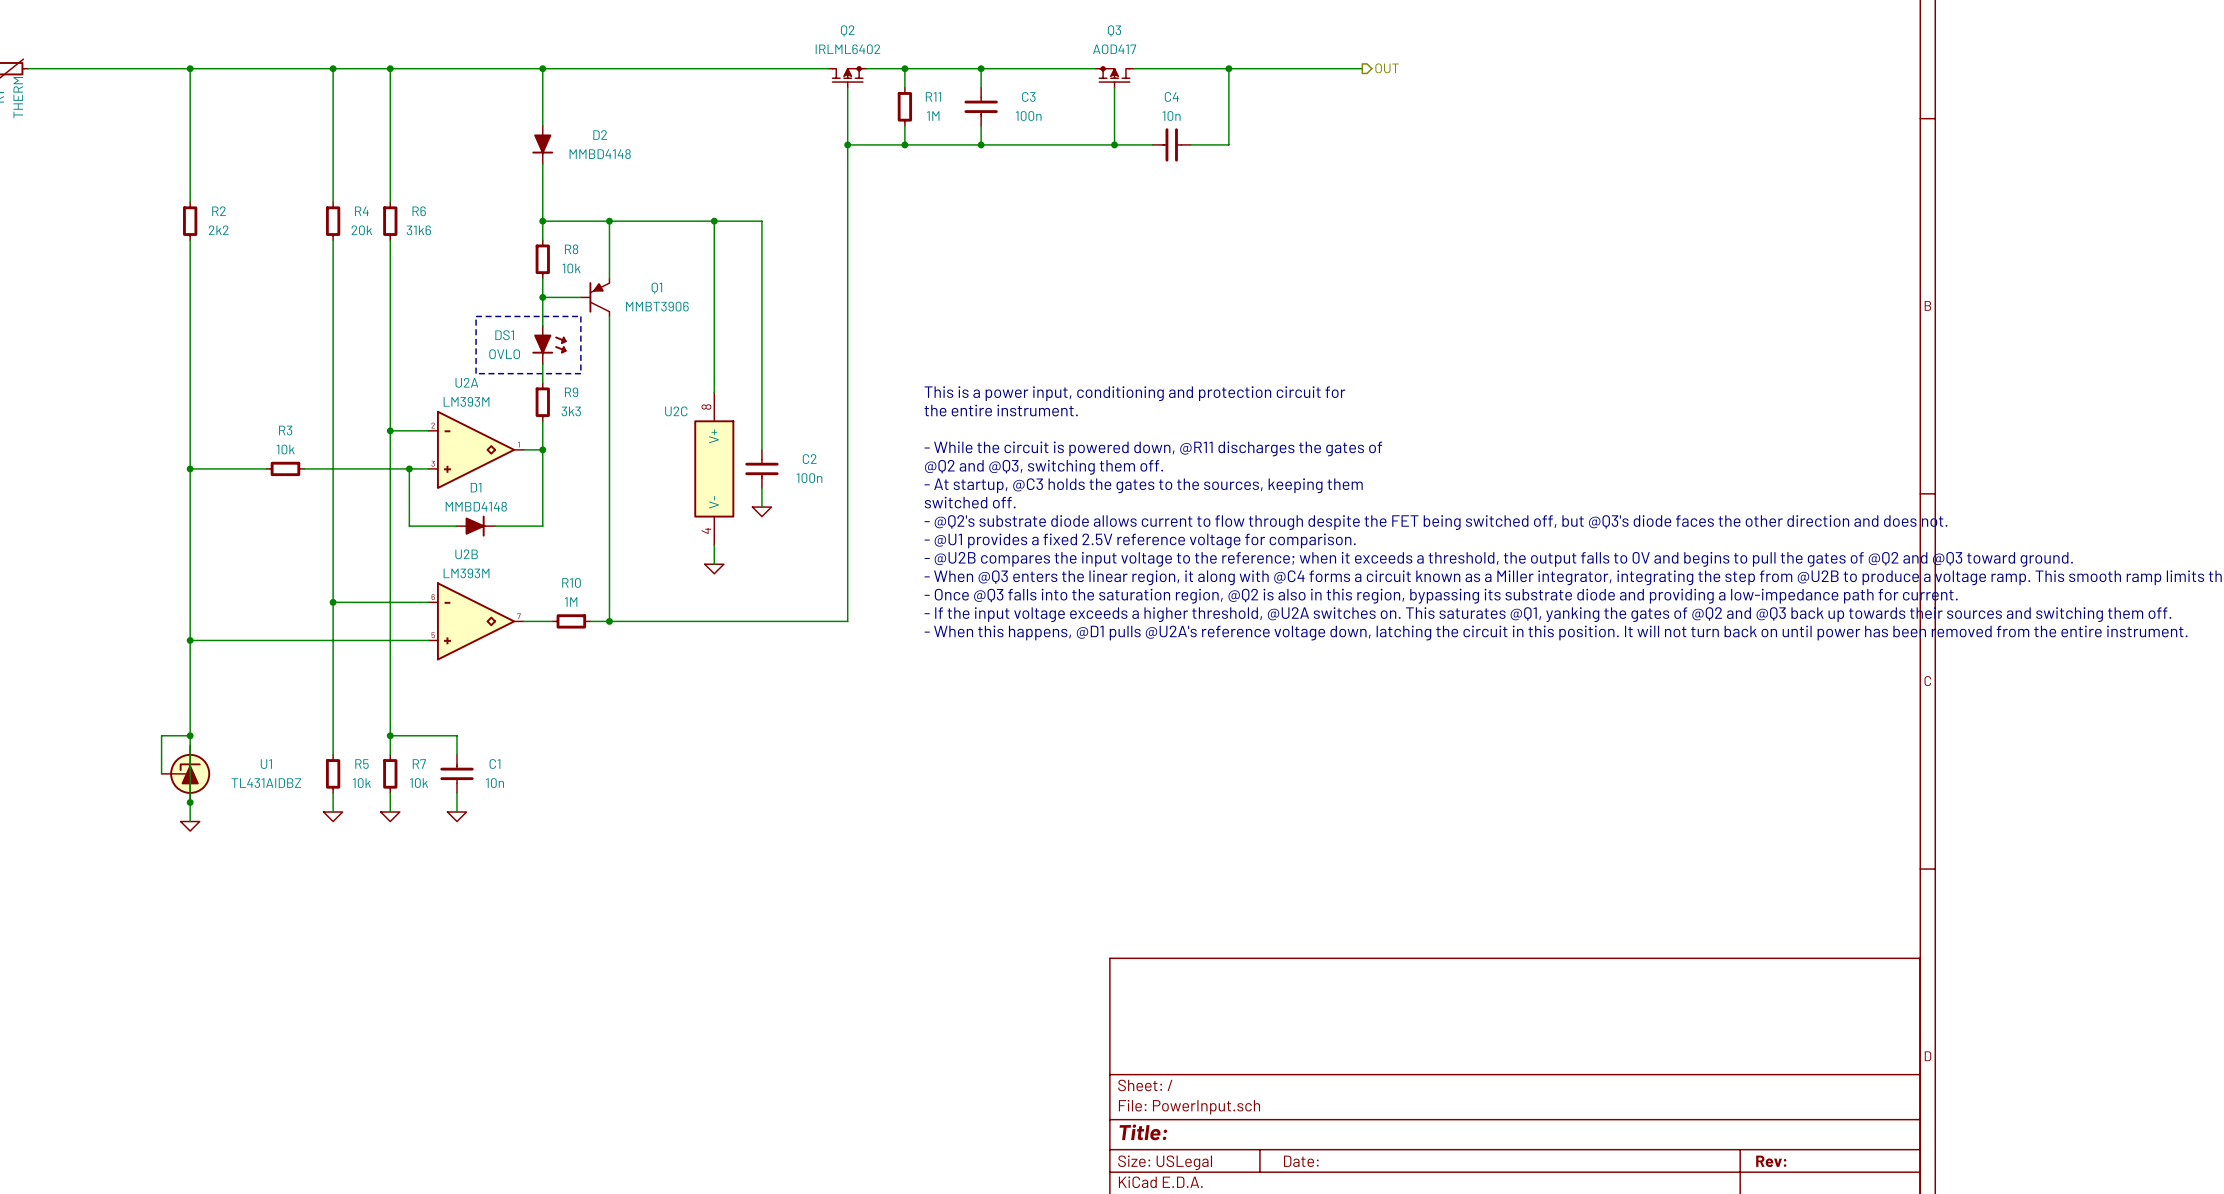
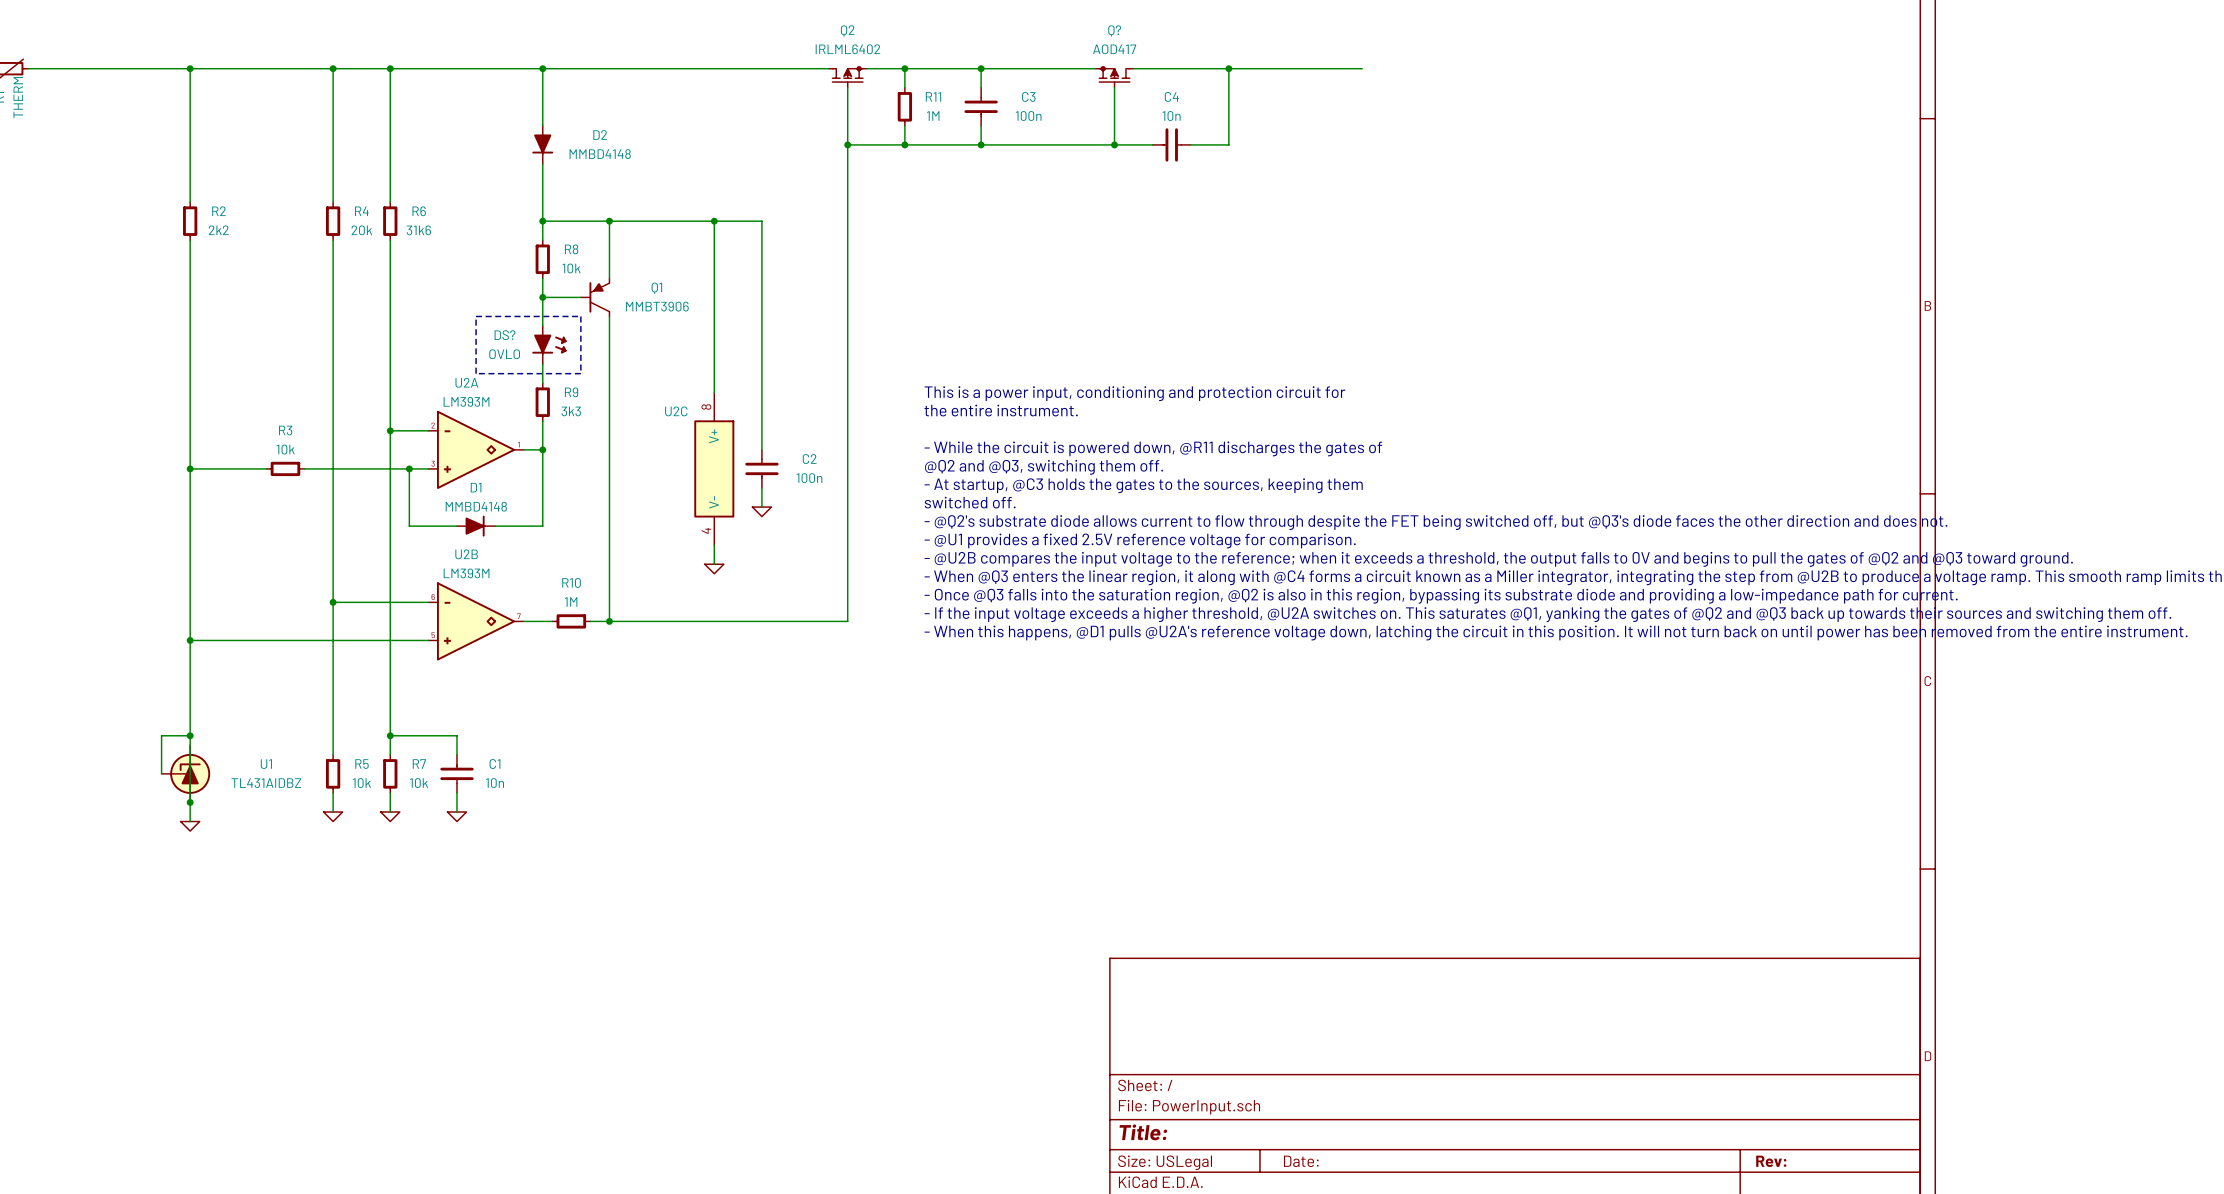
Q3 name: Q3 (1114, 30) -> Q? (1114, 30)
hierarchical label: OUT (1387, 68) -> none
DS1 name: DS1 (504, 335) -> DS? (504, 335)

